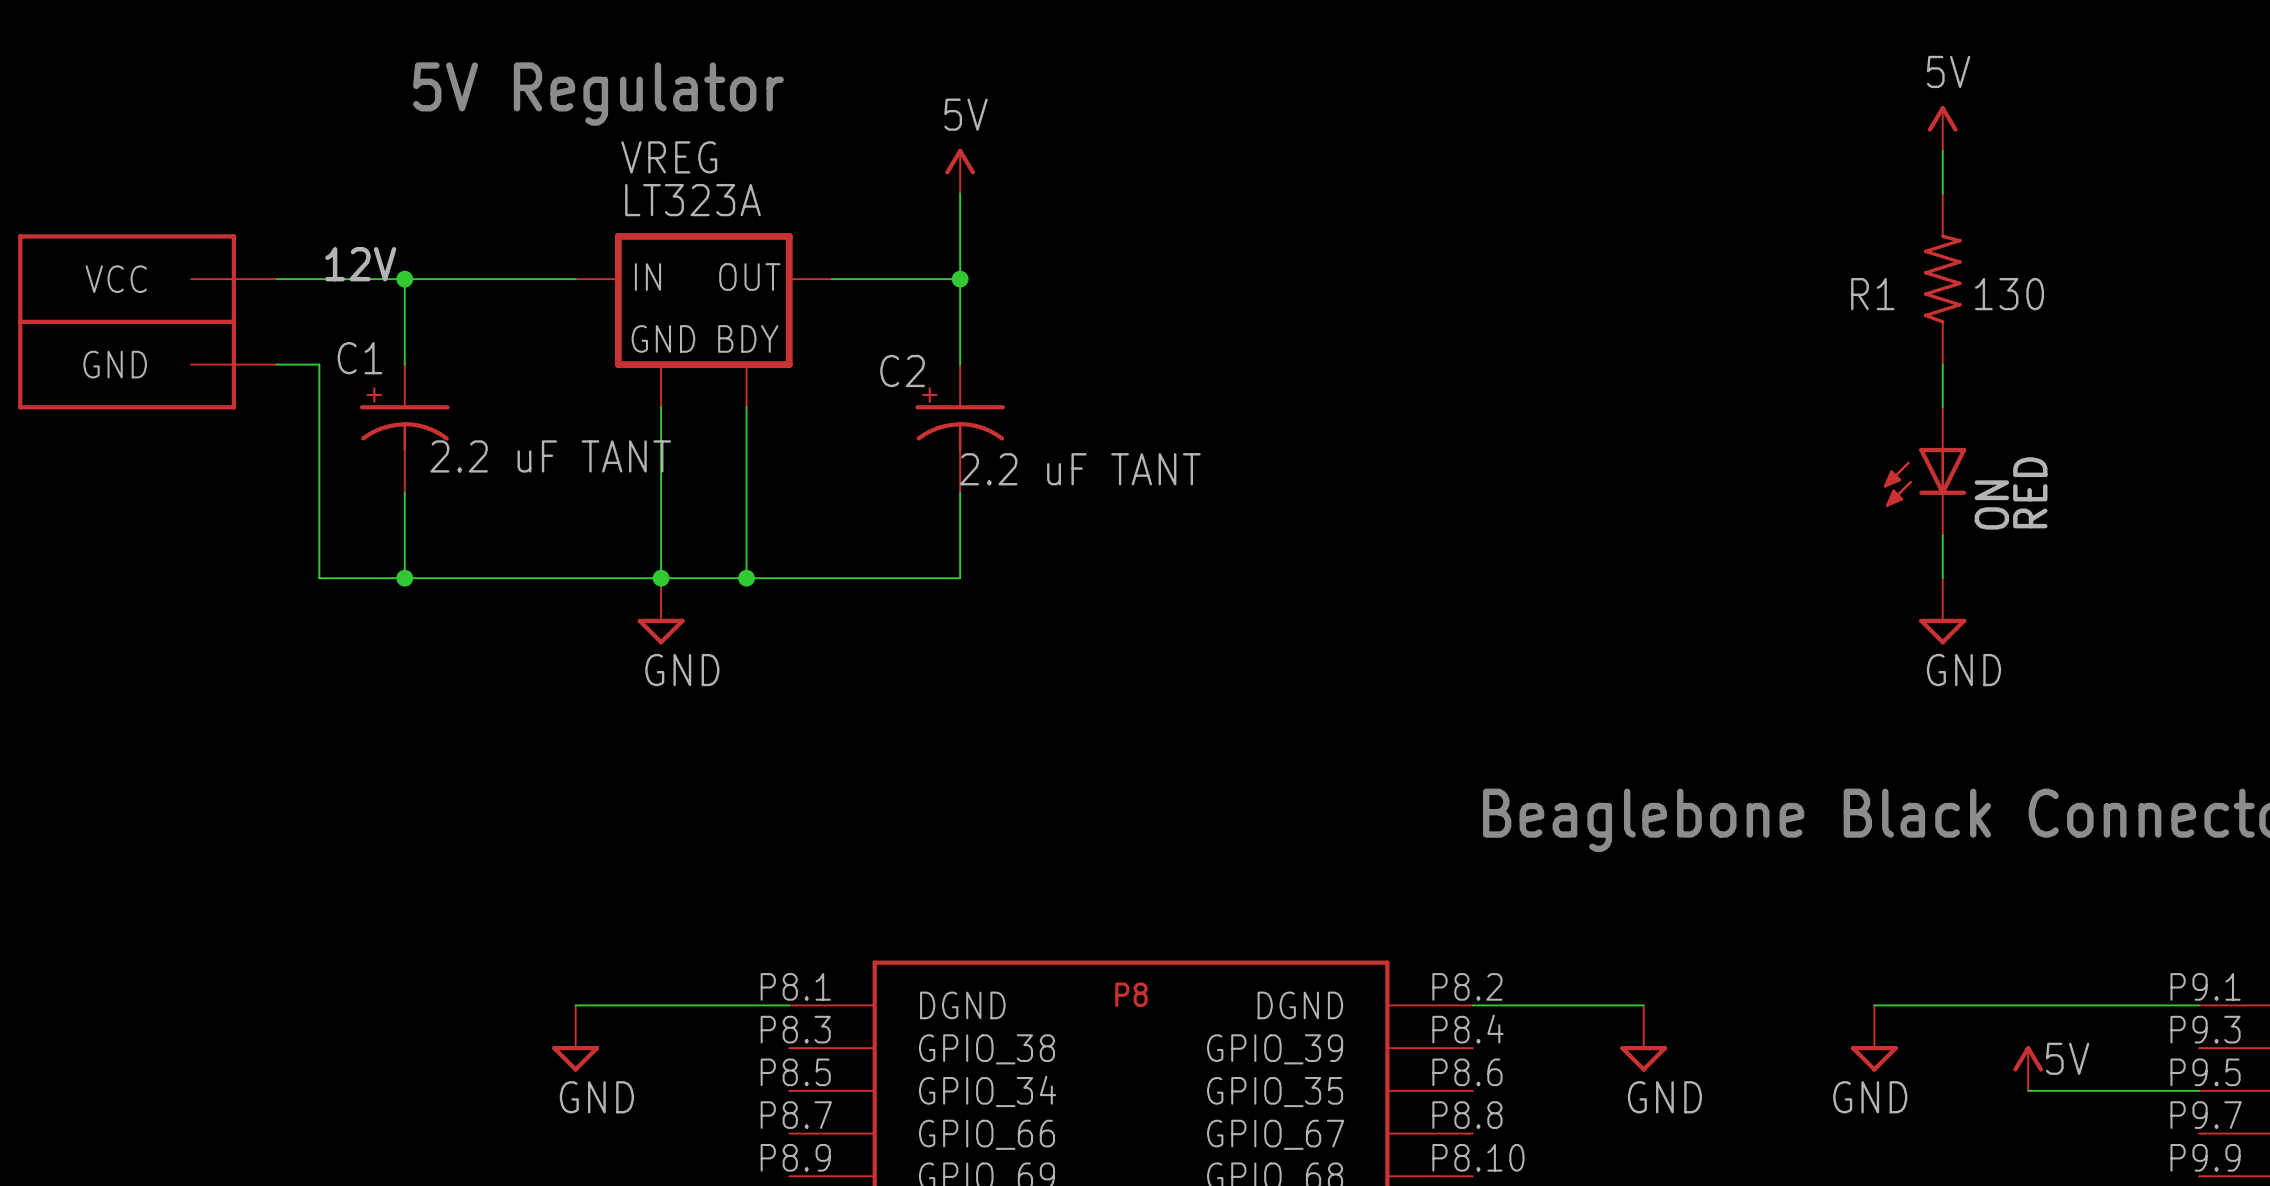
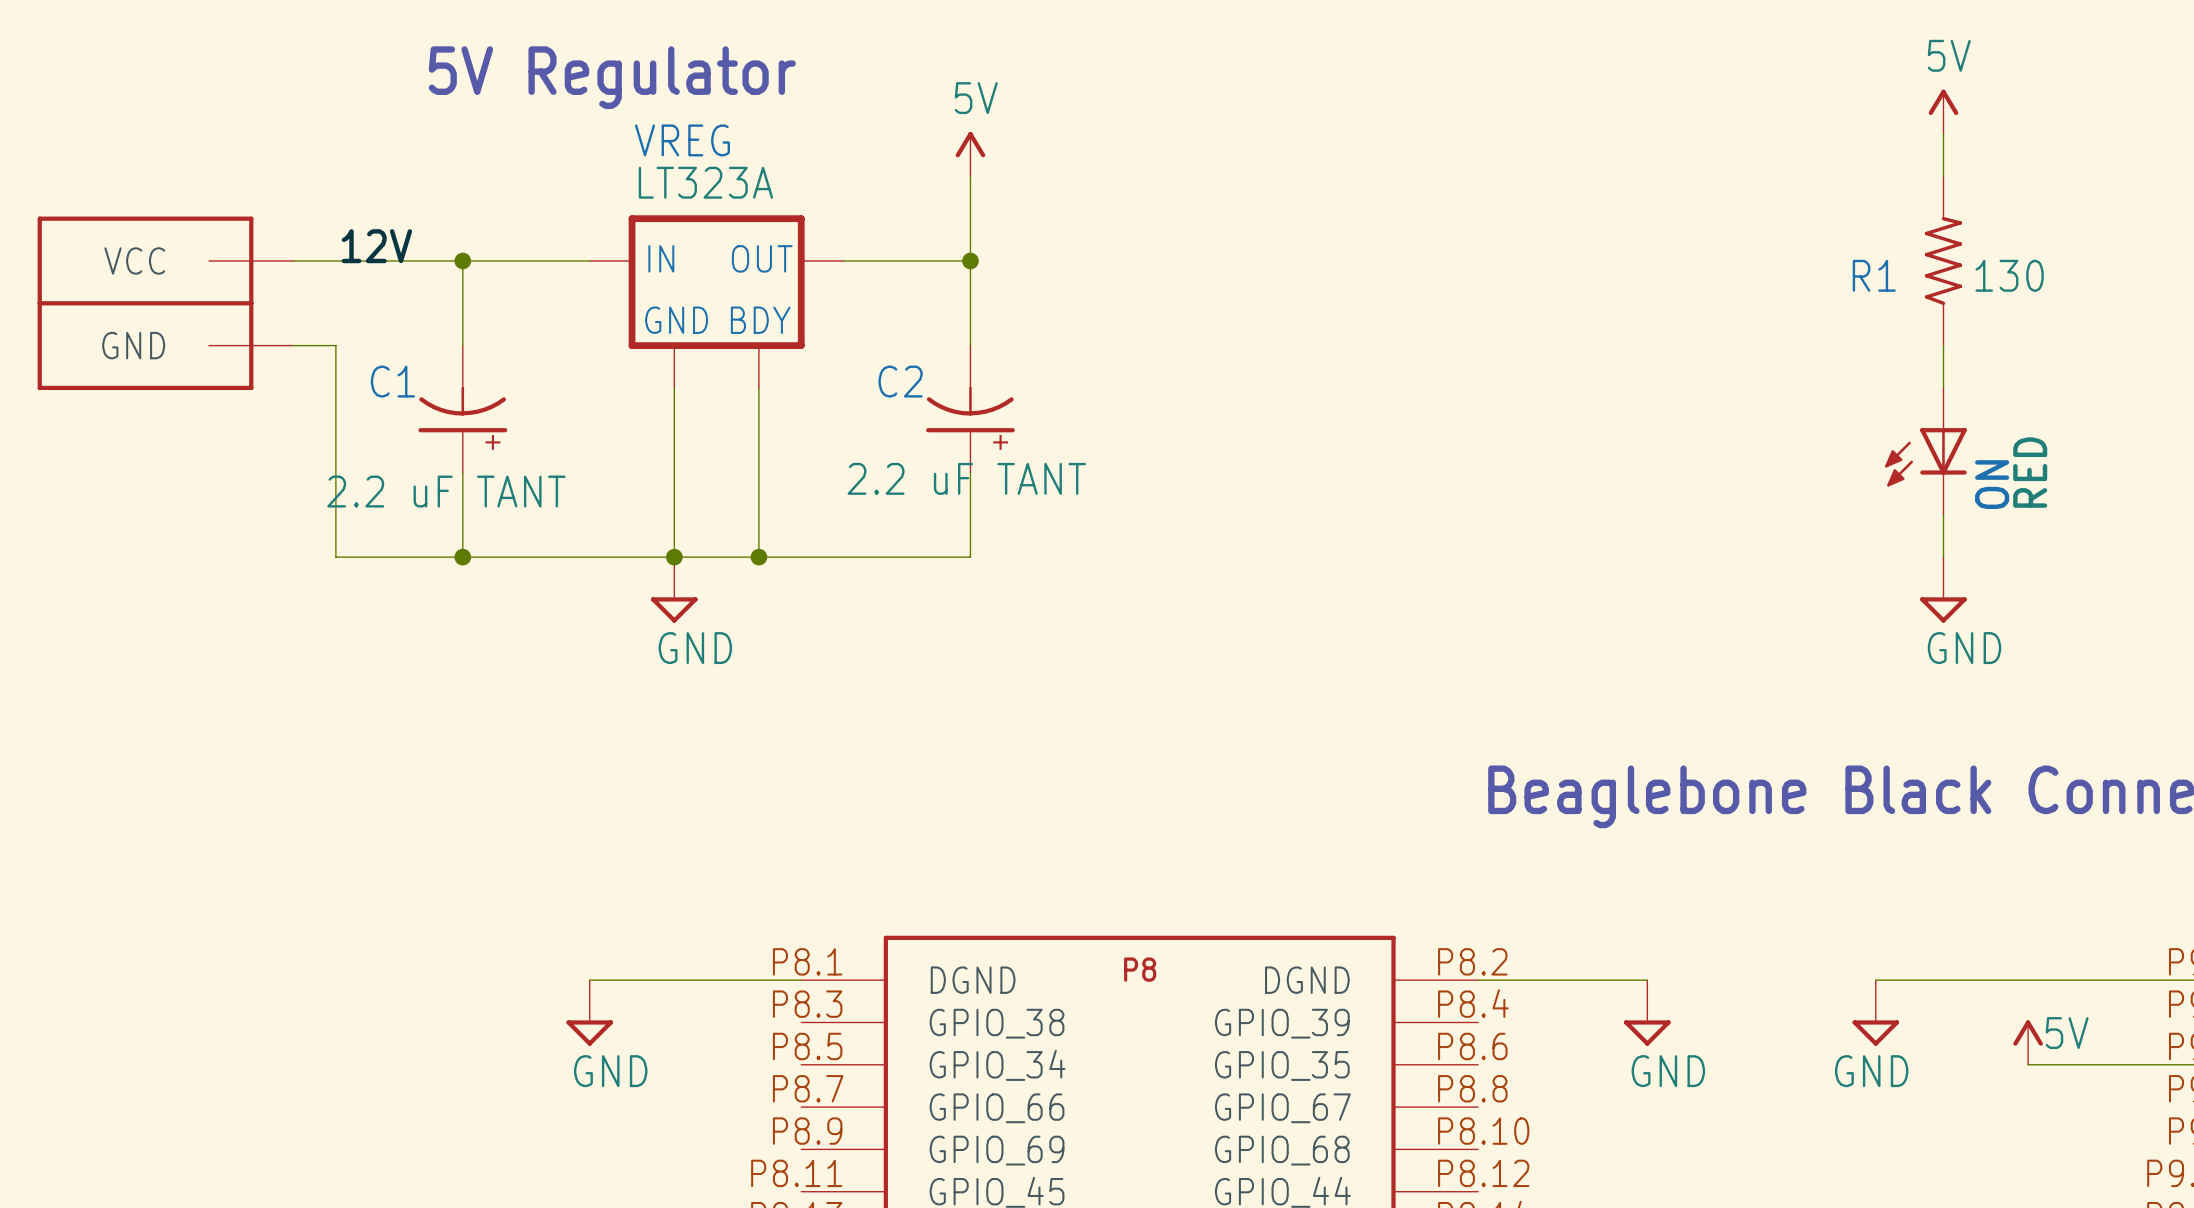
wire: (404, 279) (404, 364) -> (462, 260) (462, 345)
junction position: (404, 279) -> (462, 260)
C1 name position: C1 (359, 358) -> C1 (392, 381)
C2 name position: C2 (902, 370) -> C2 (900, 381)
C1 rotation: 0° (404, 419) -> 180° (462, 418)
C2 rotation: 0° (960, 419) -> 180° (970, 418)
C1 value position: 2.2 uF TANT (550, 456) -> 2.2 uF TANT (446, 491)
C2 value position: 2.2 uF TANT (1080, 469) -> 2.2 uF TANT (966, 478)
wire: (404, 492) (404, 578) -> (462, 472) (462, 557)
junction position: (404, 578) -> (462, 557)

